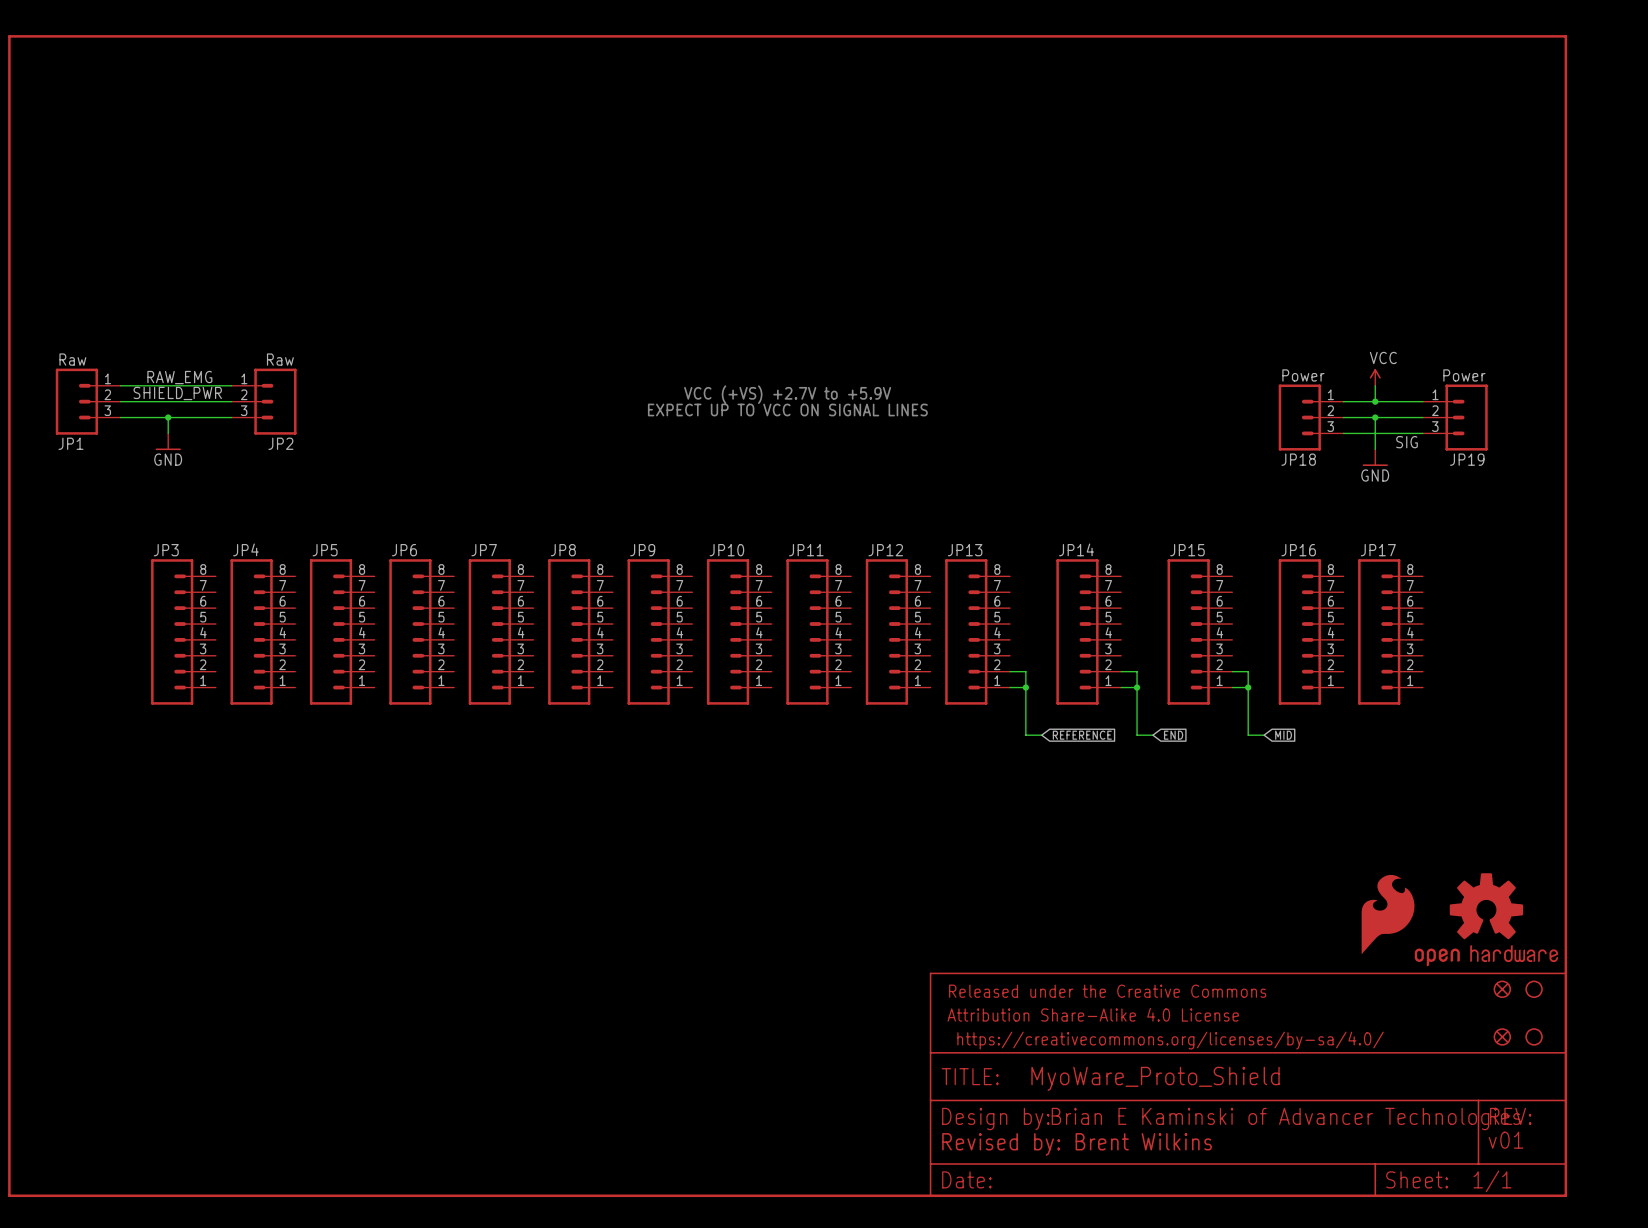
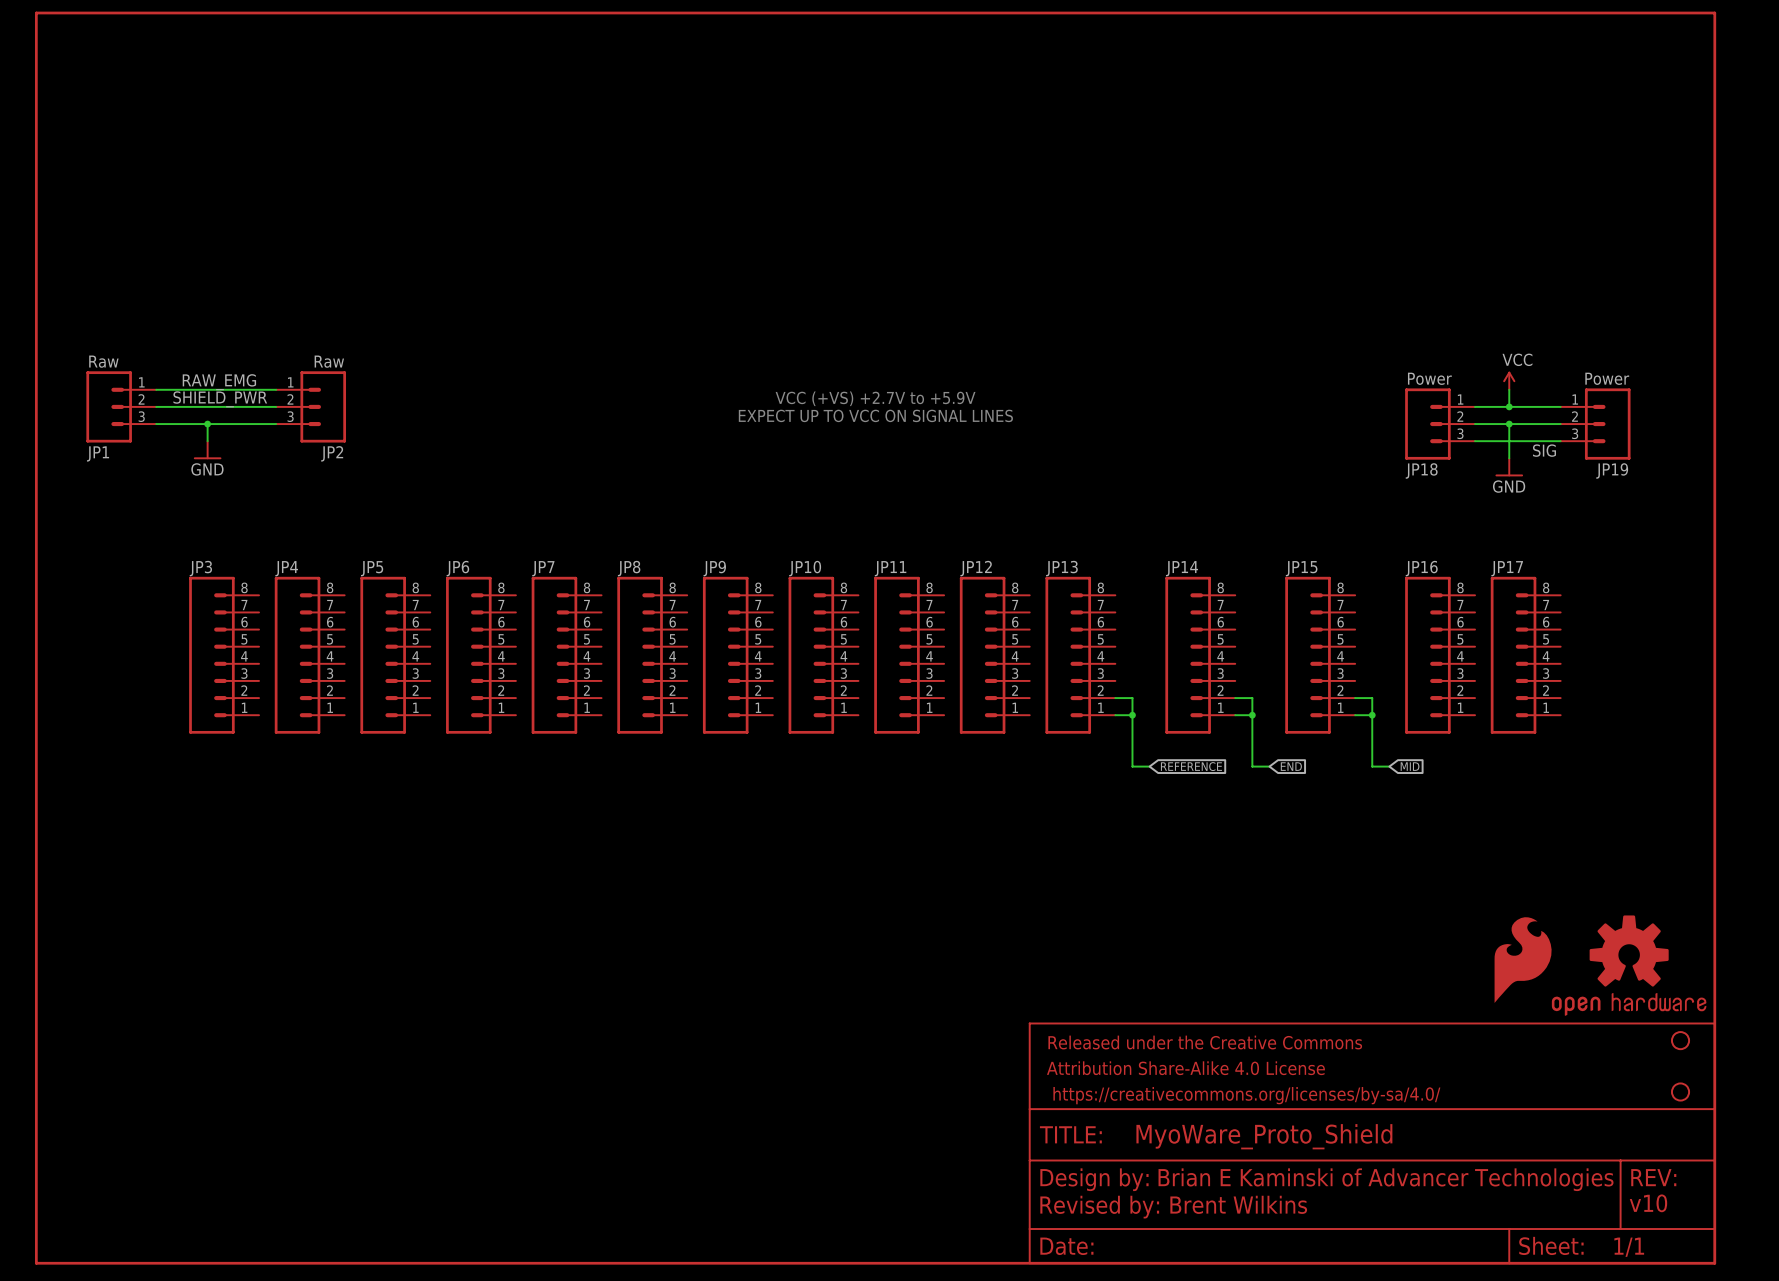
part: (1502, 989) -> none
part: (1502, 1036) -> none
text: v01 (1505, 1140) -> v10 (1648, 1203)

